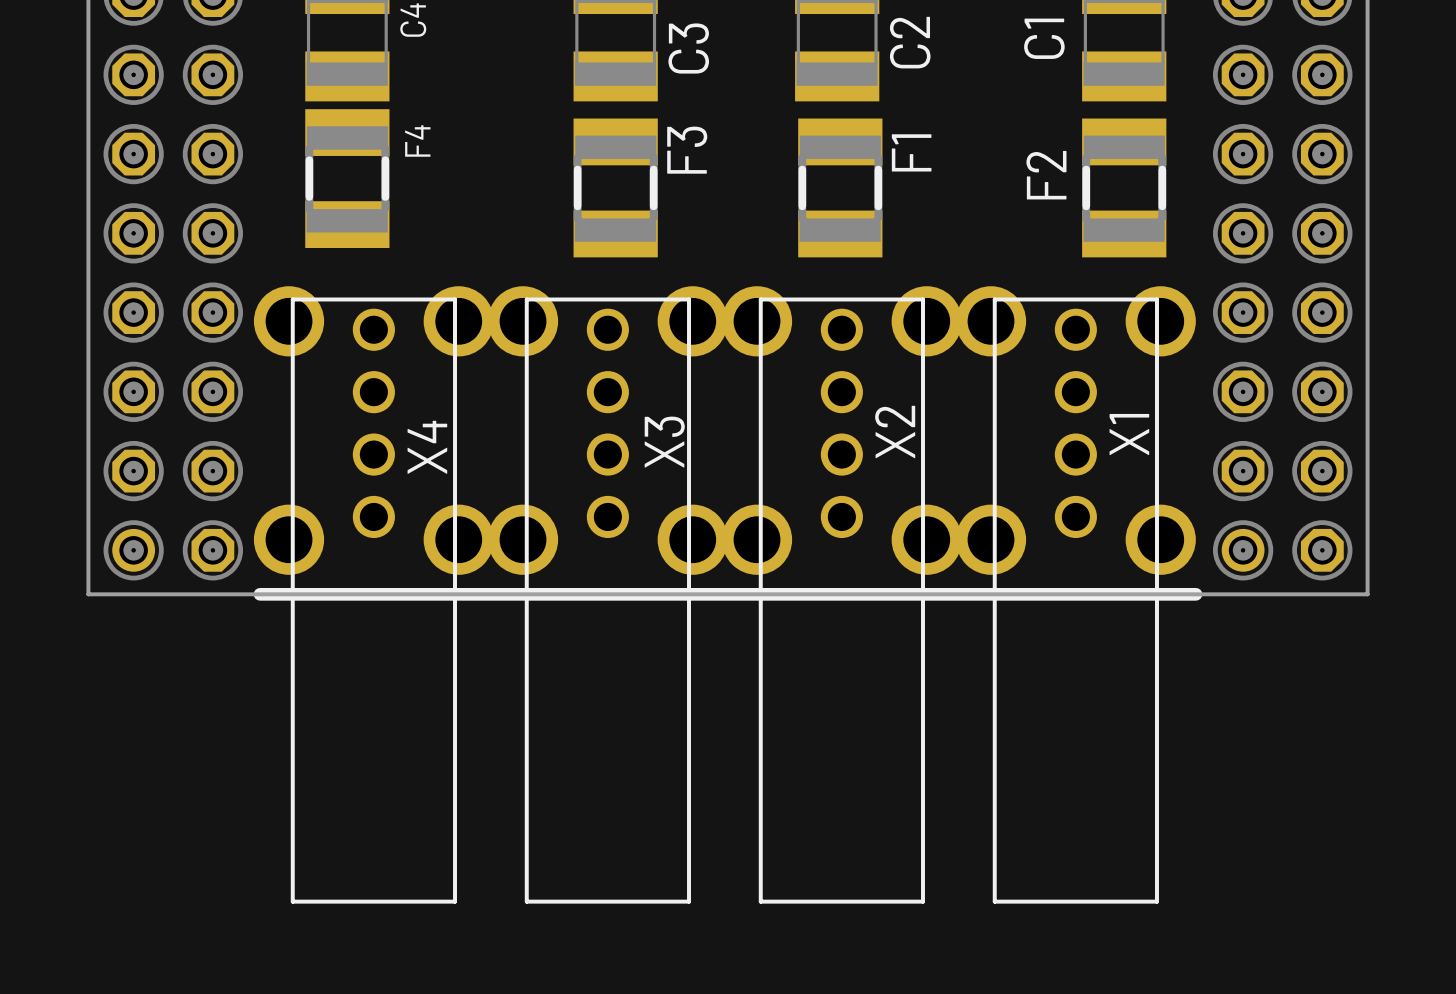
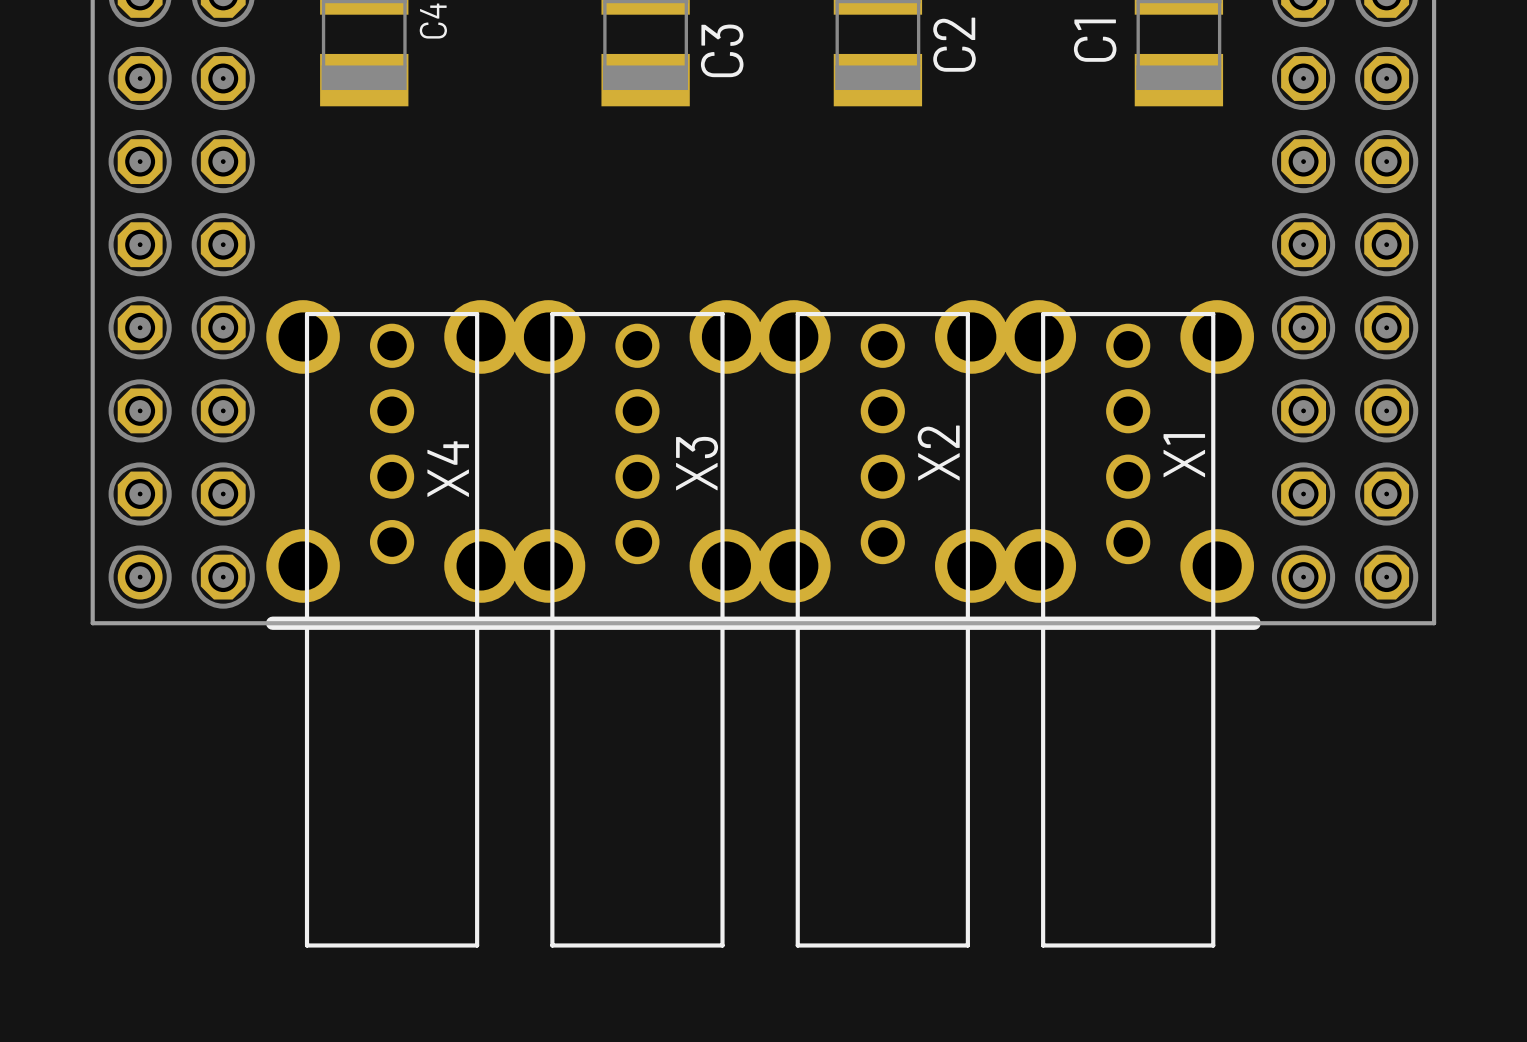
F4: (347, 178) -> none
F3: (615, 187) -> none
F1: (840, 187) -> none
F2: (1124, 187) -> none

